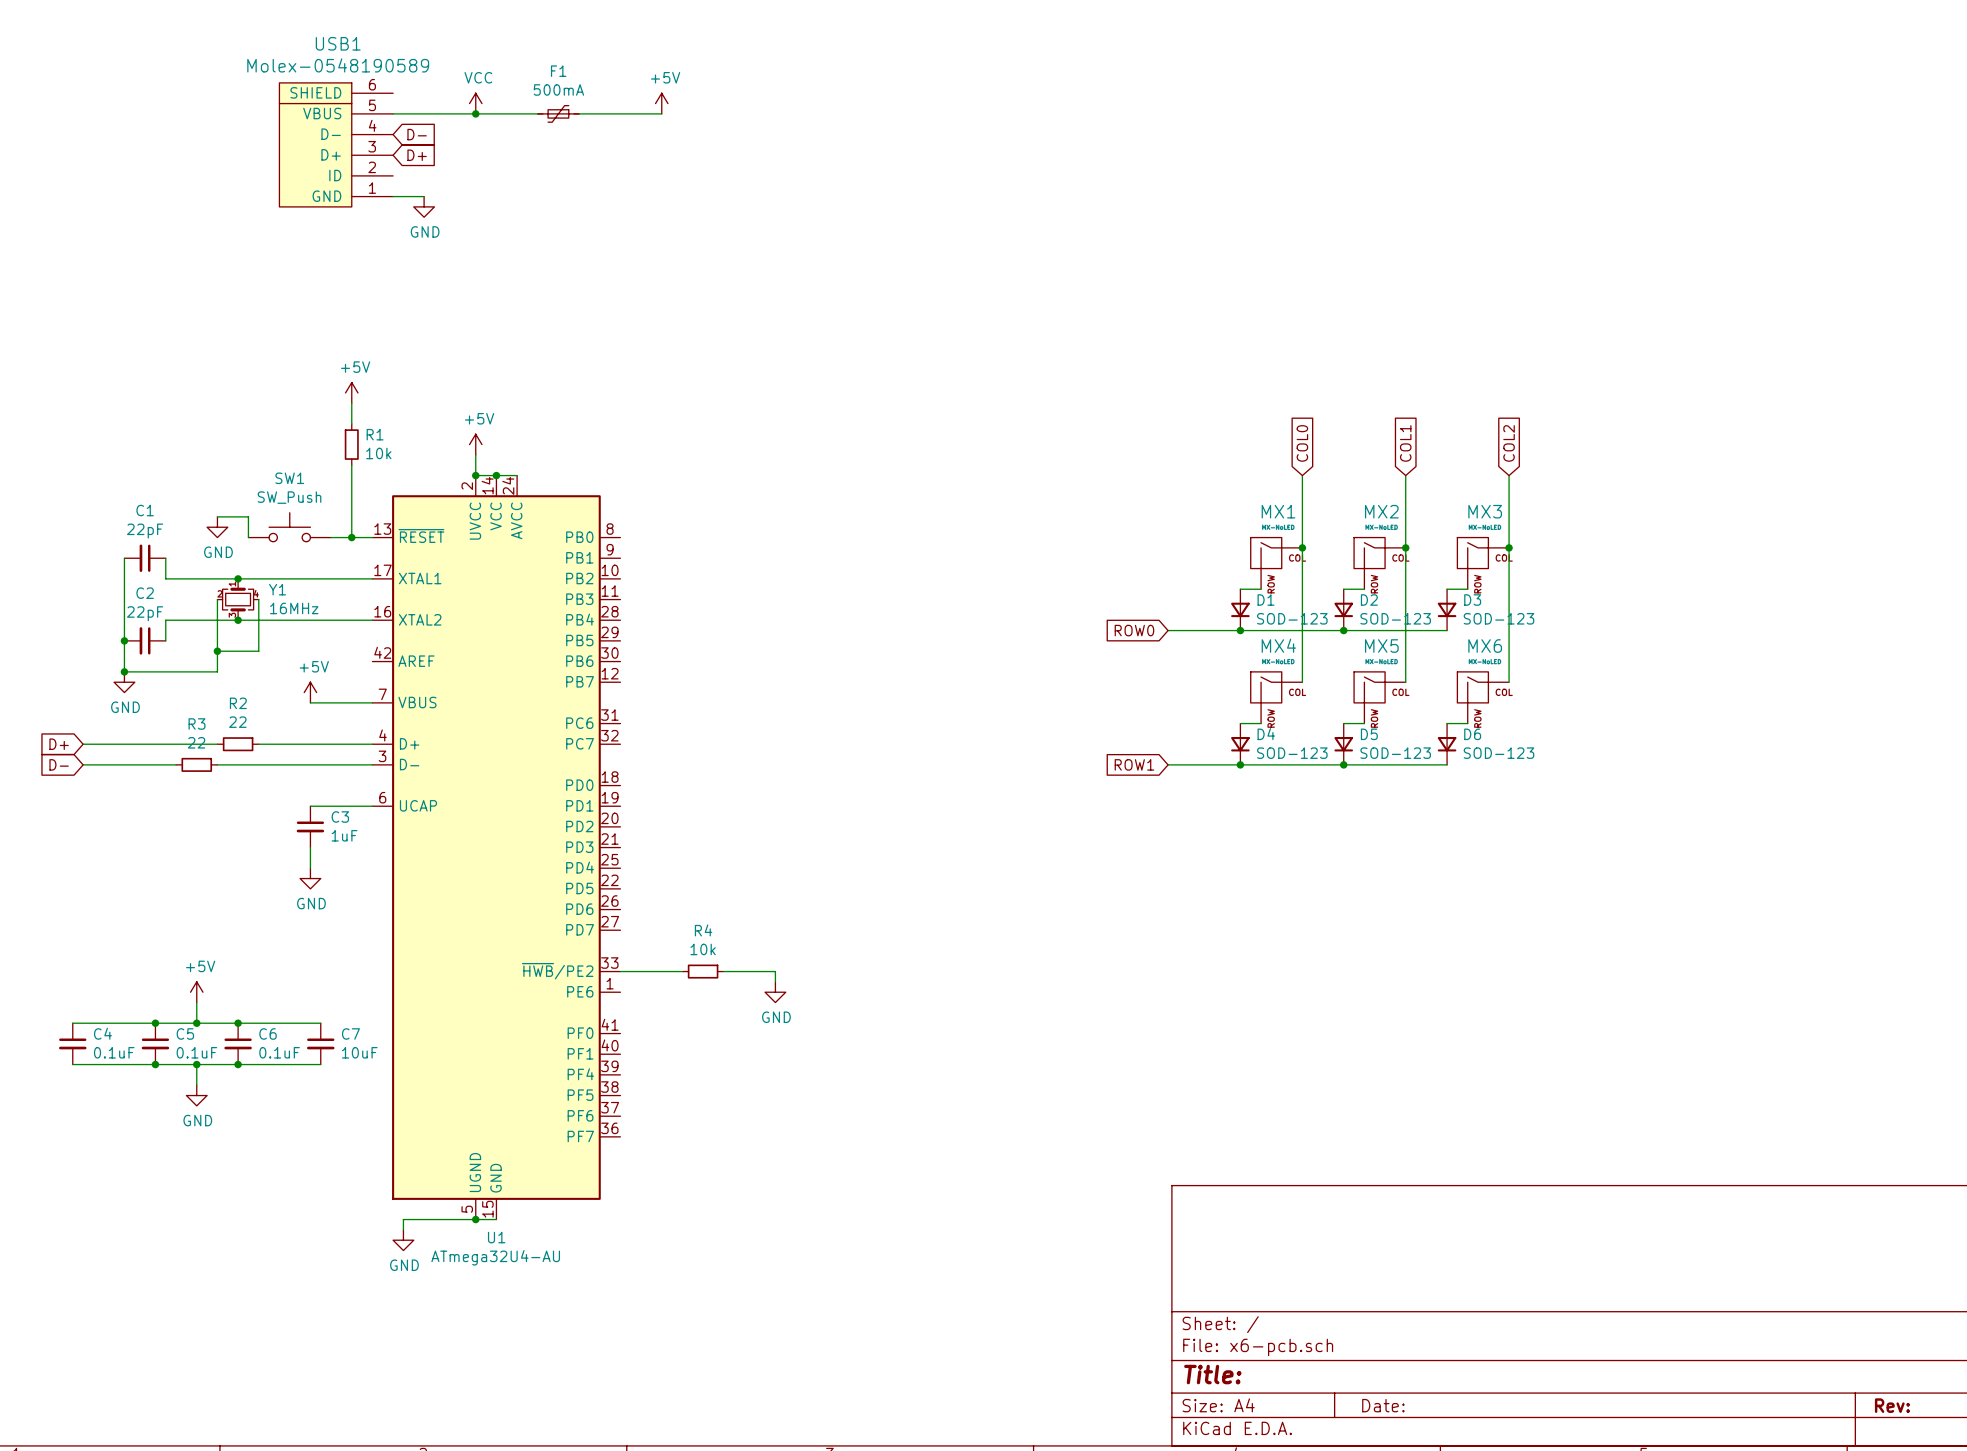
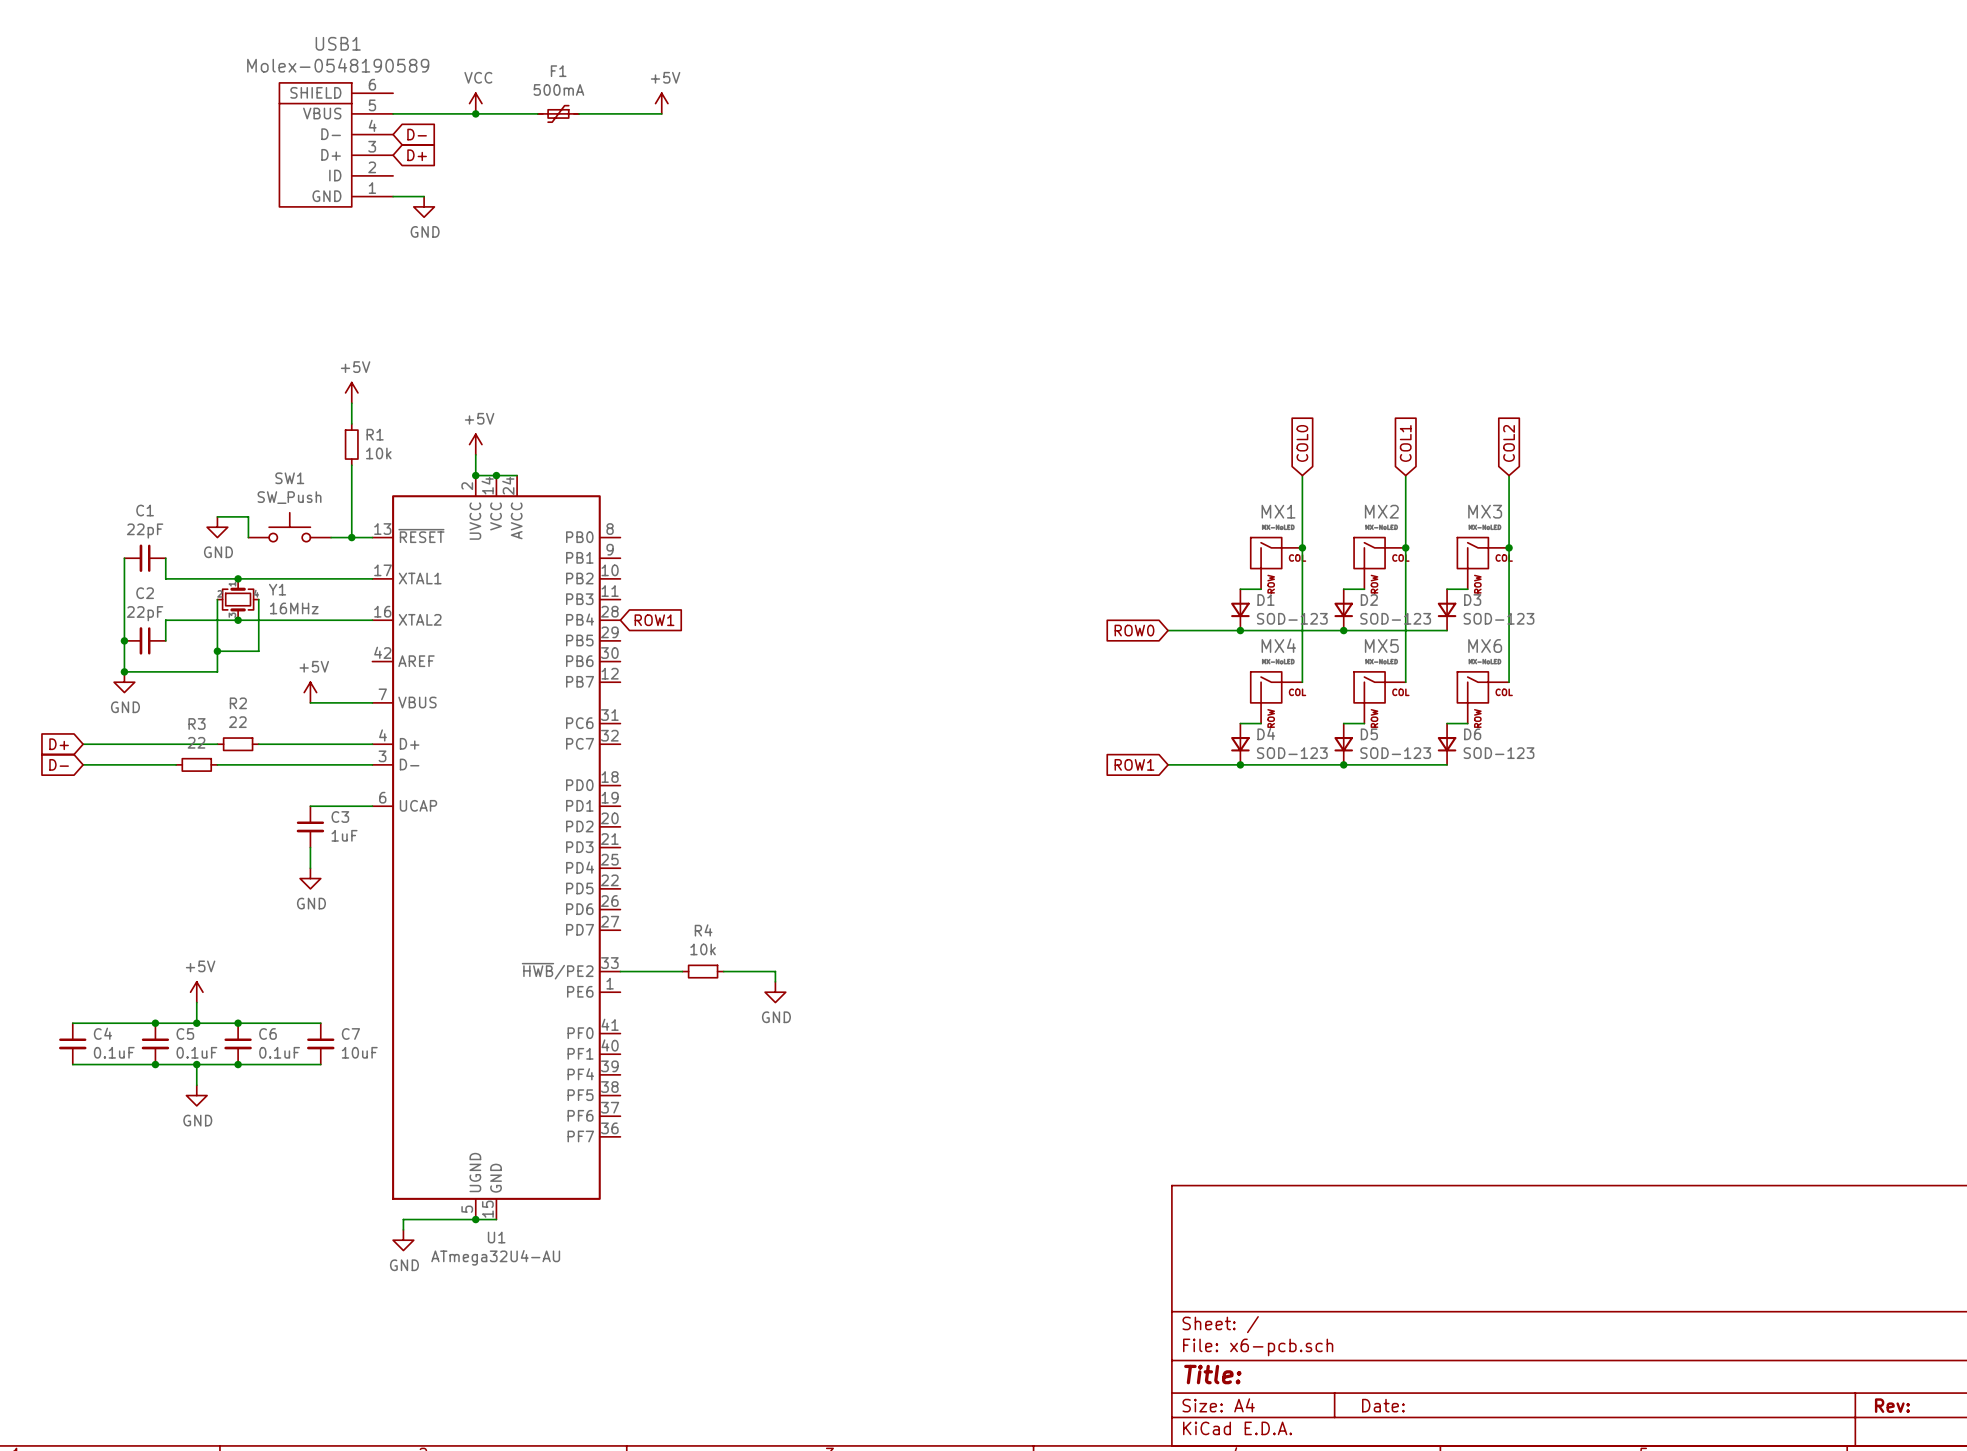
global label: none -> ROW1 (654, 620)

